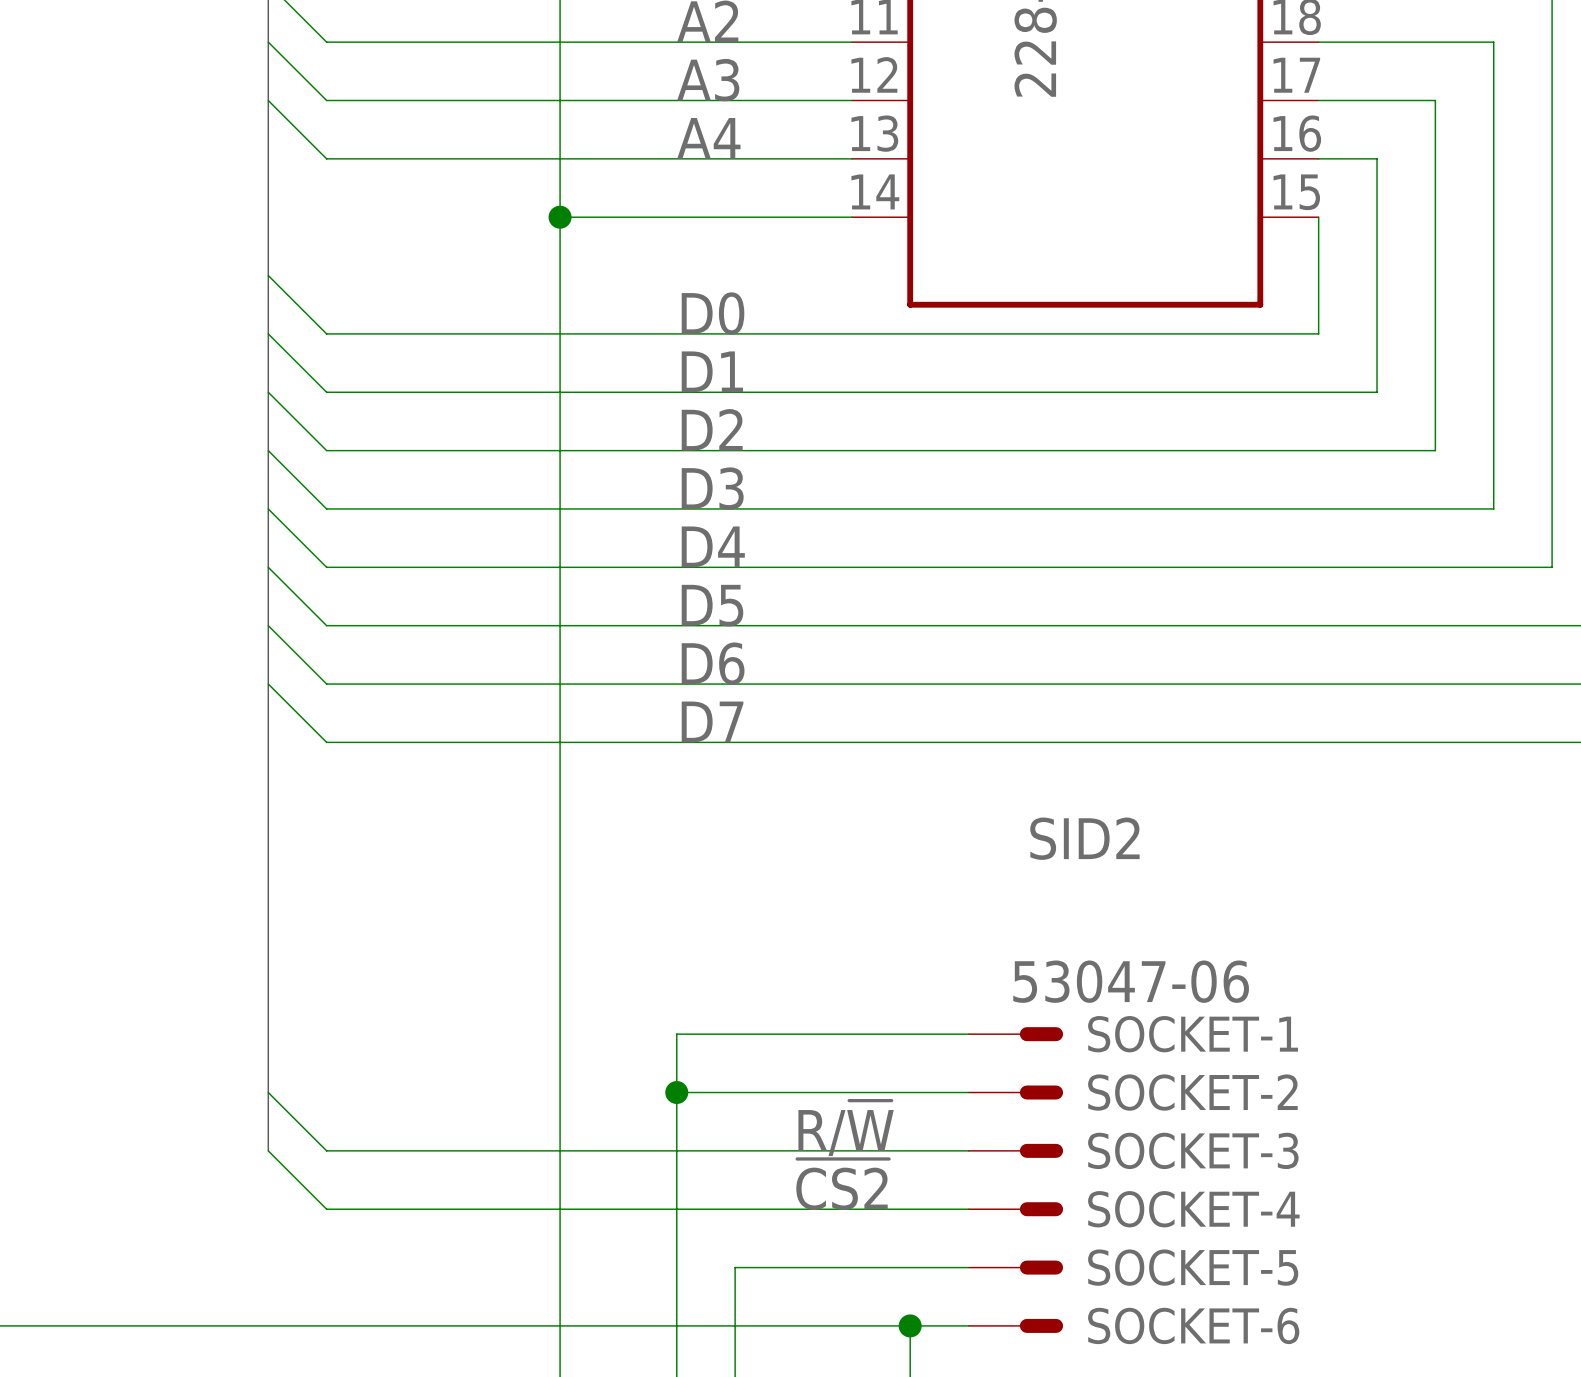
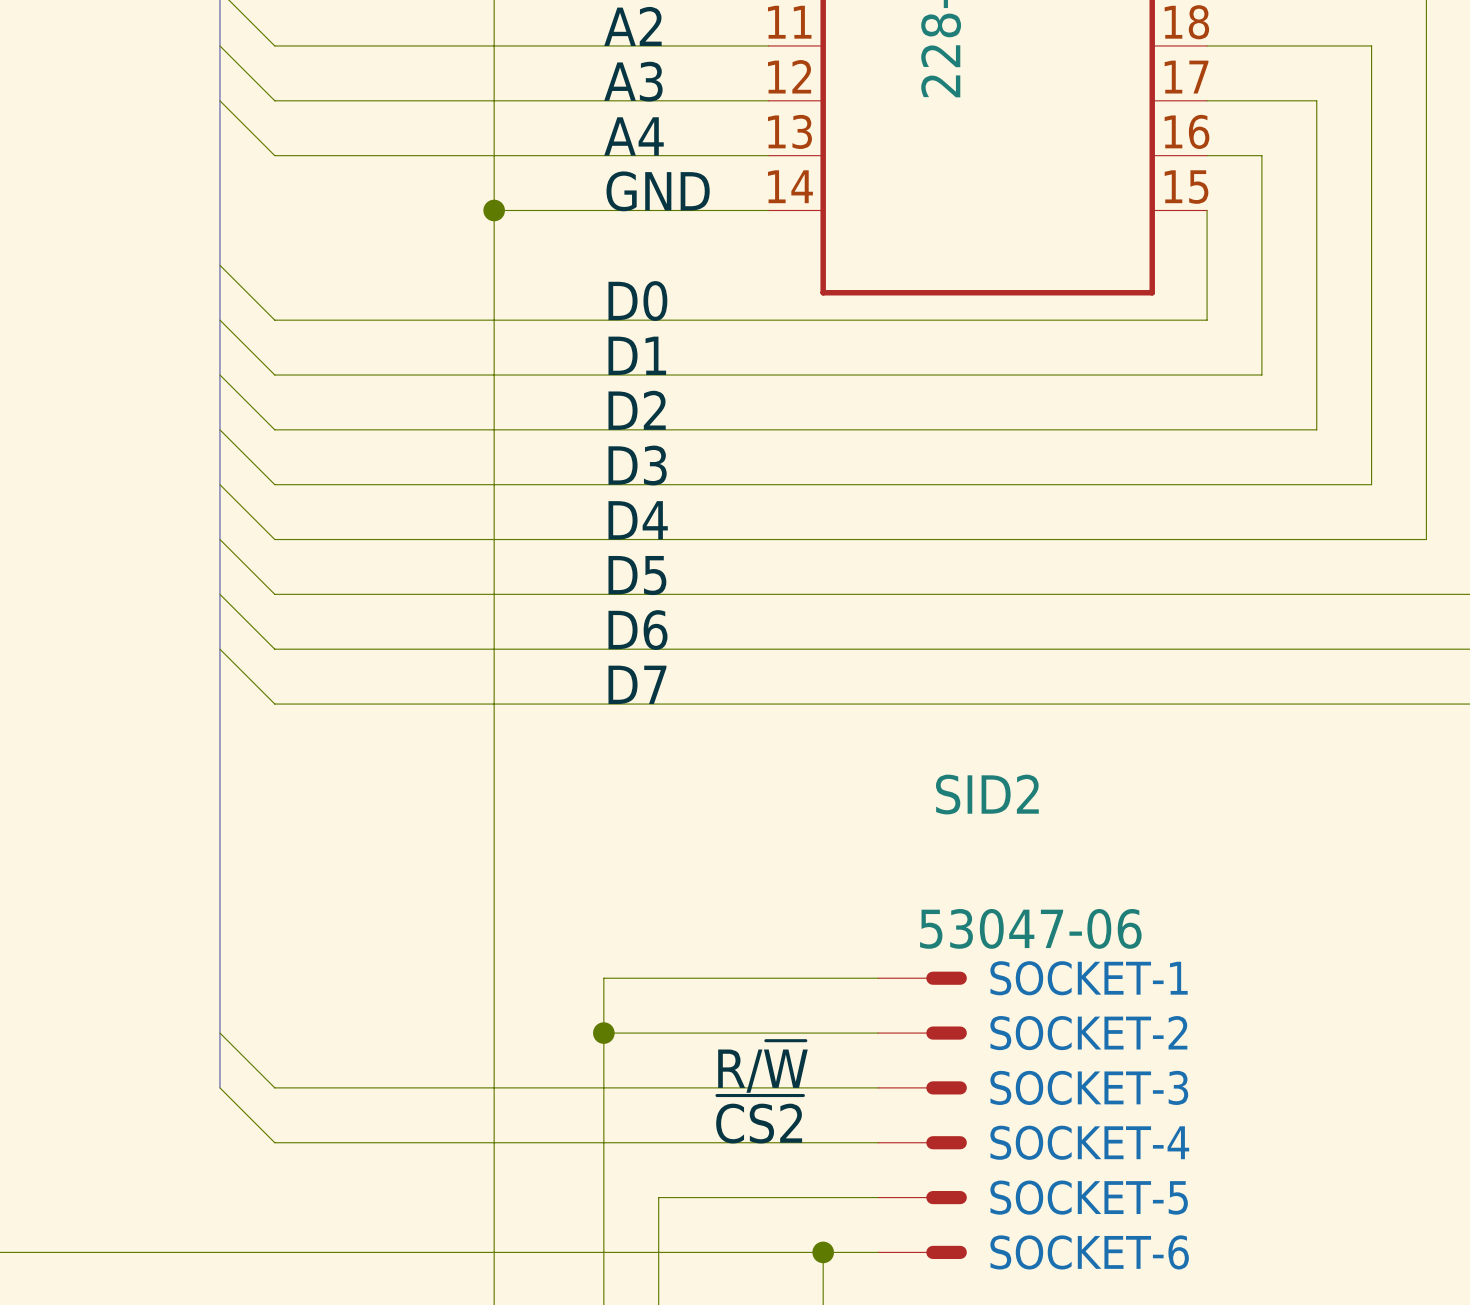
label: none -> GND (658, 191)

